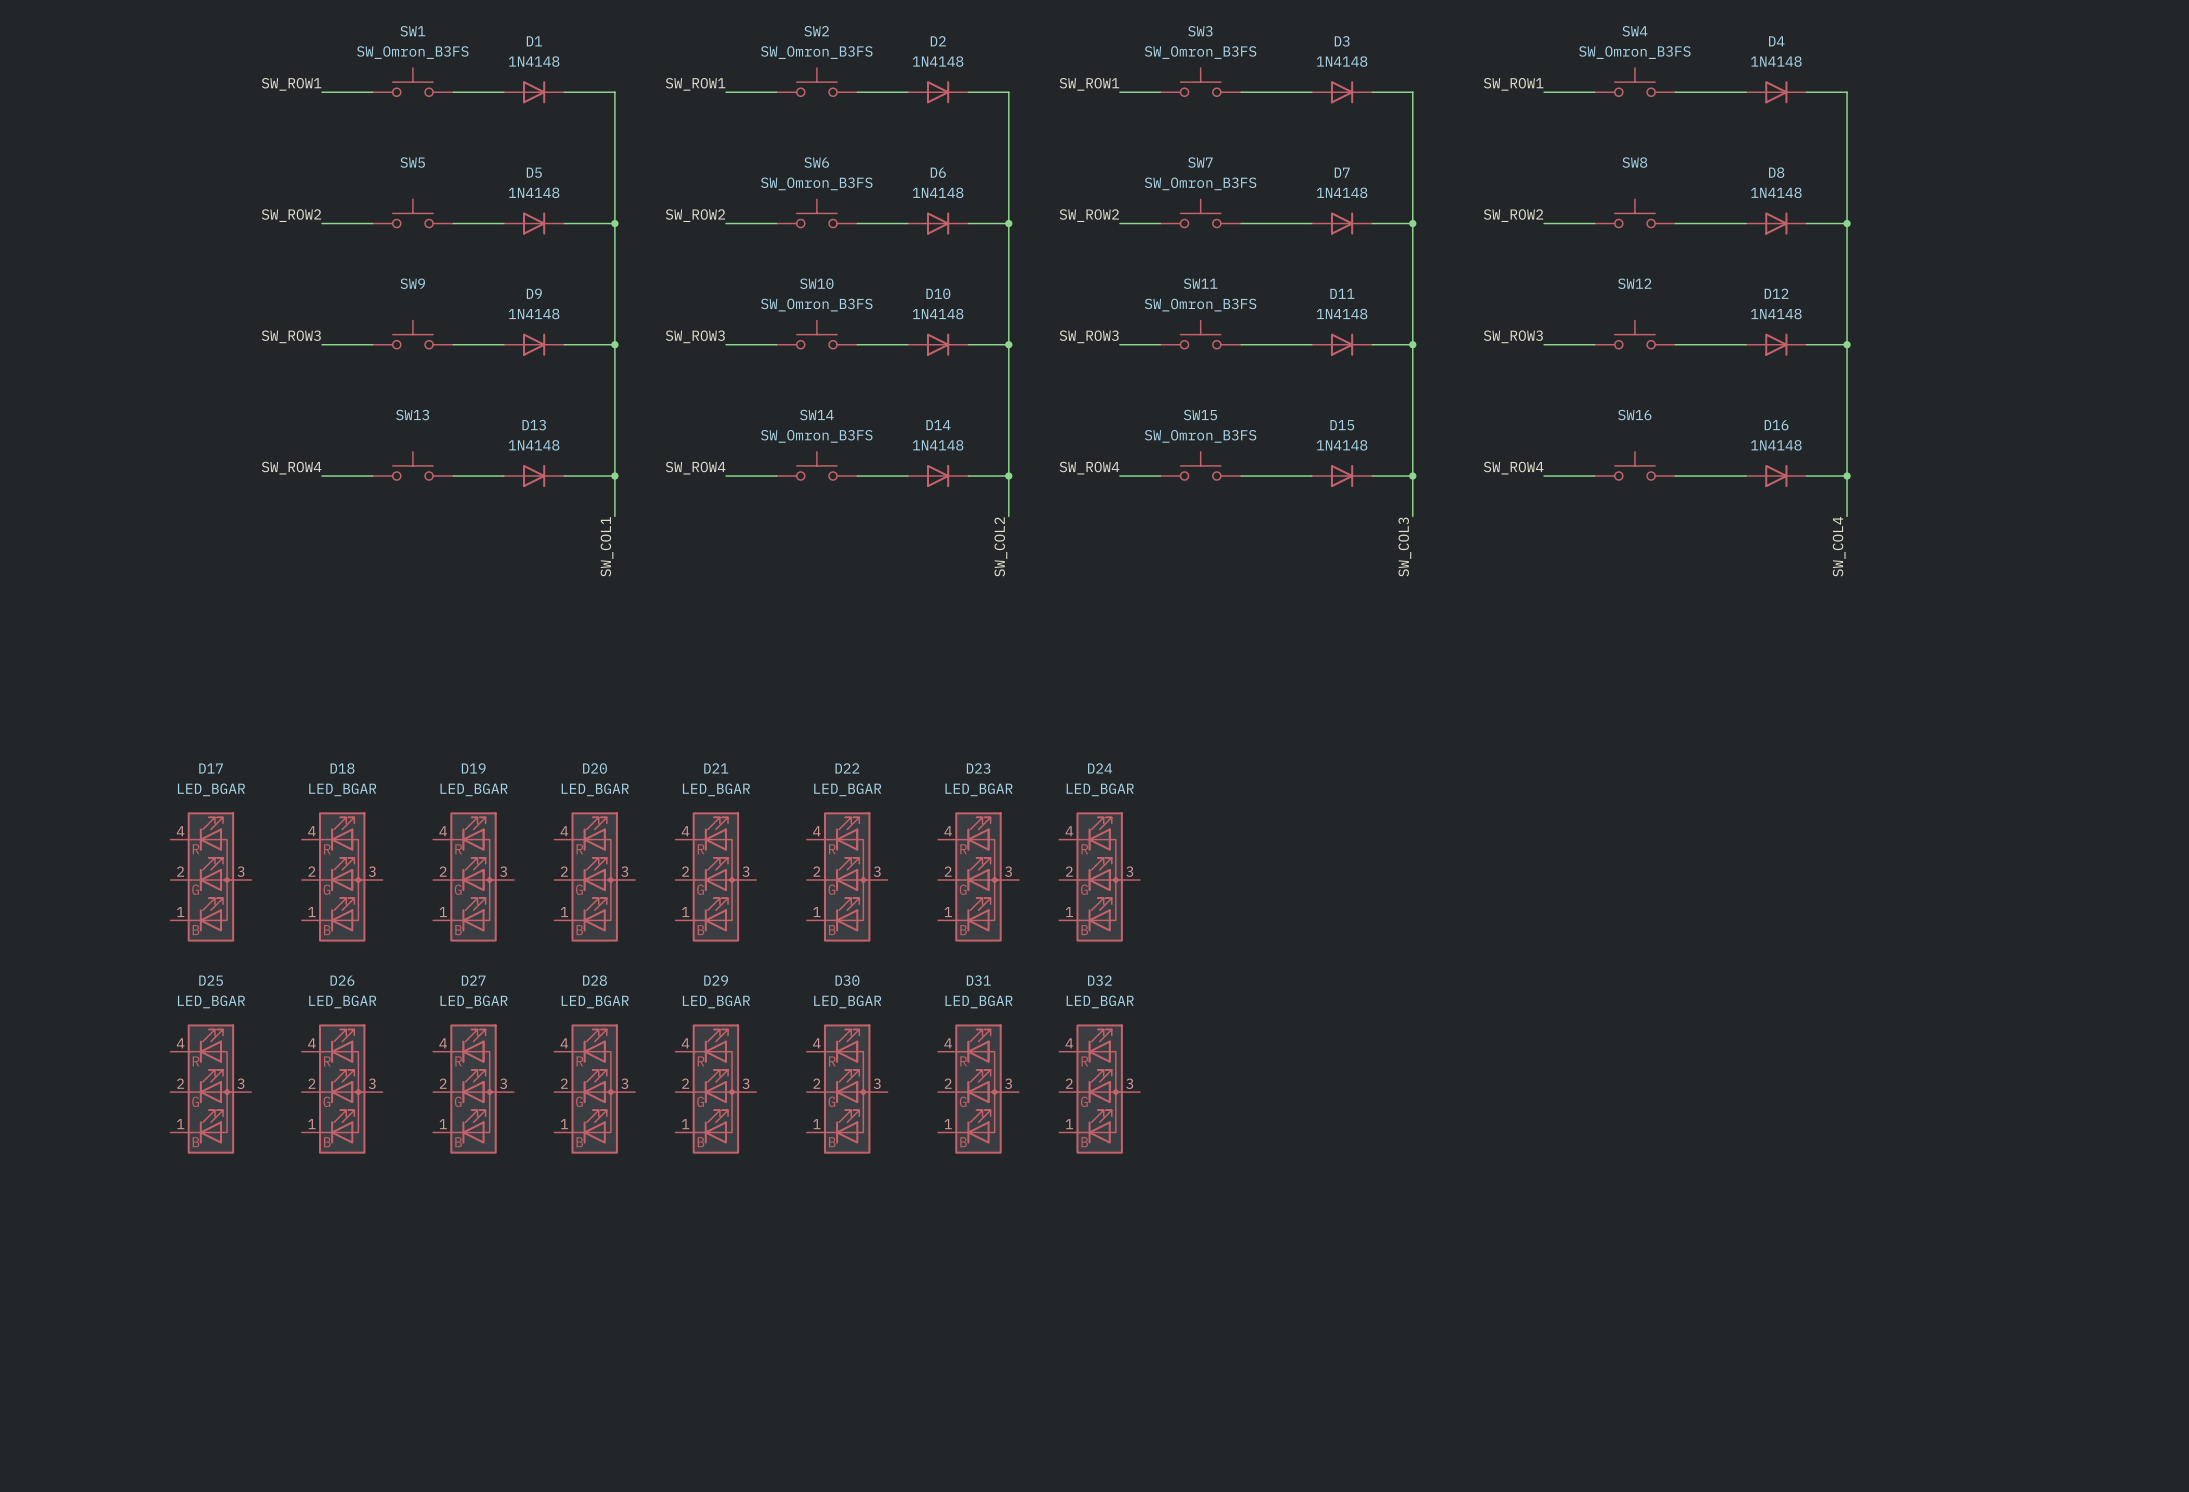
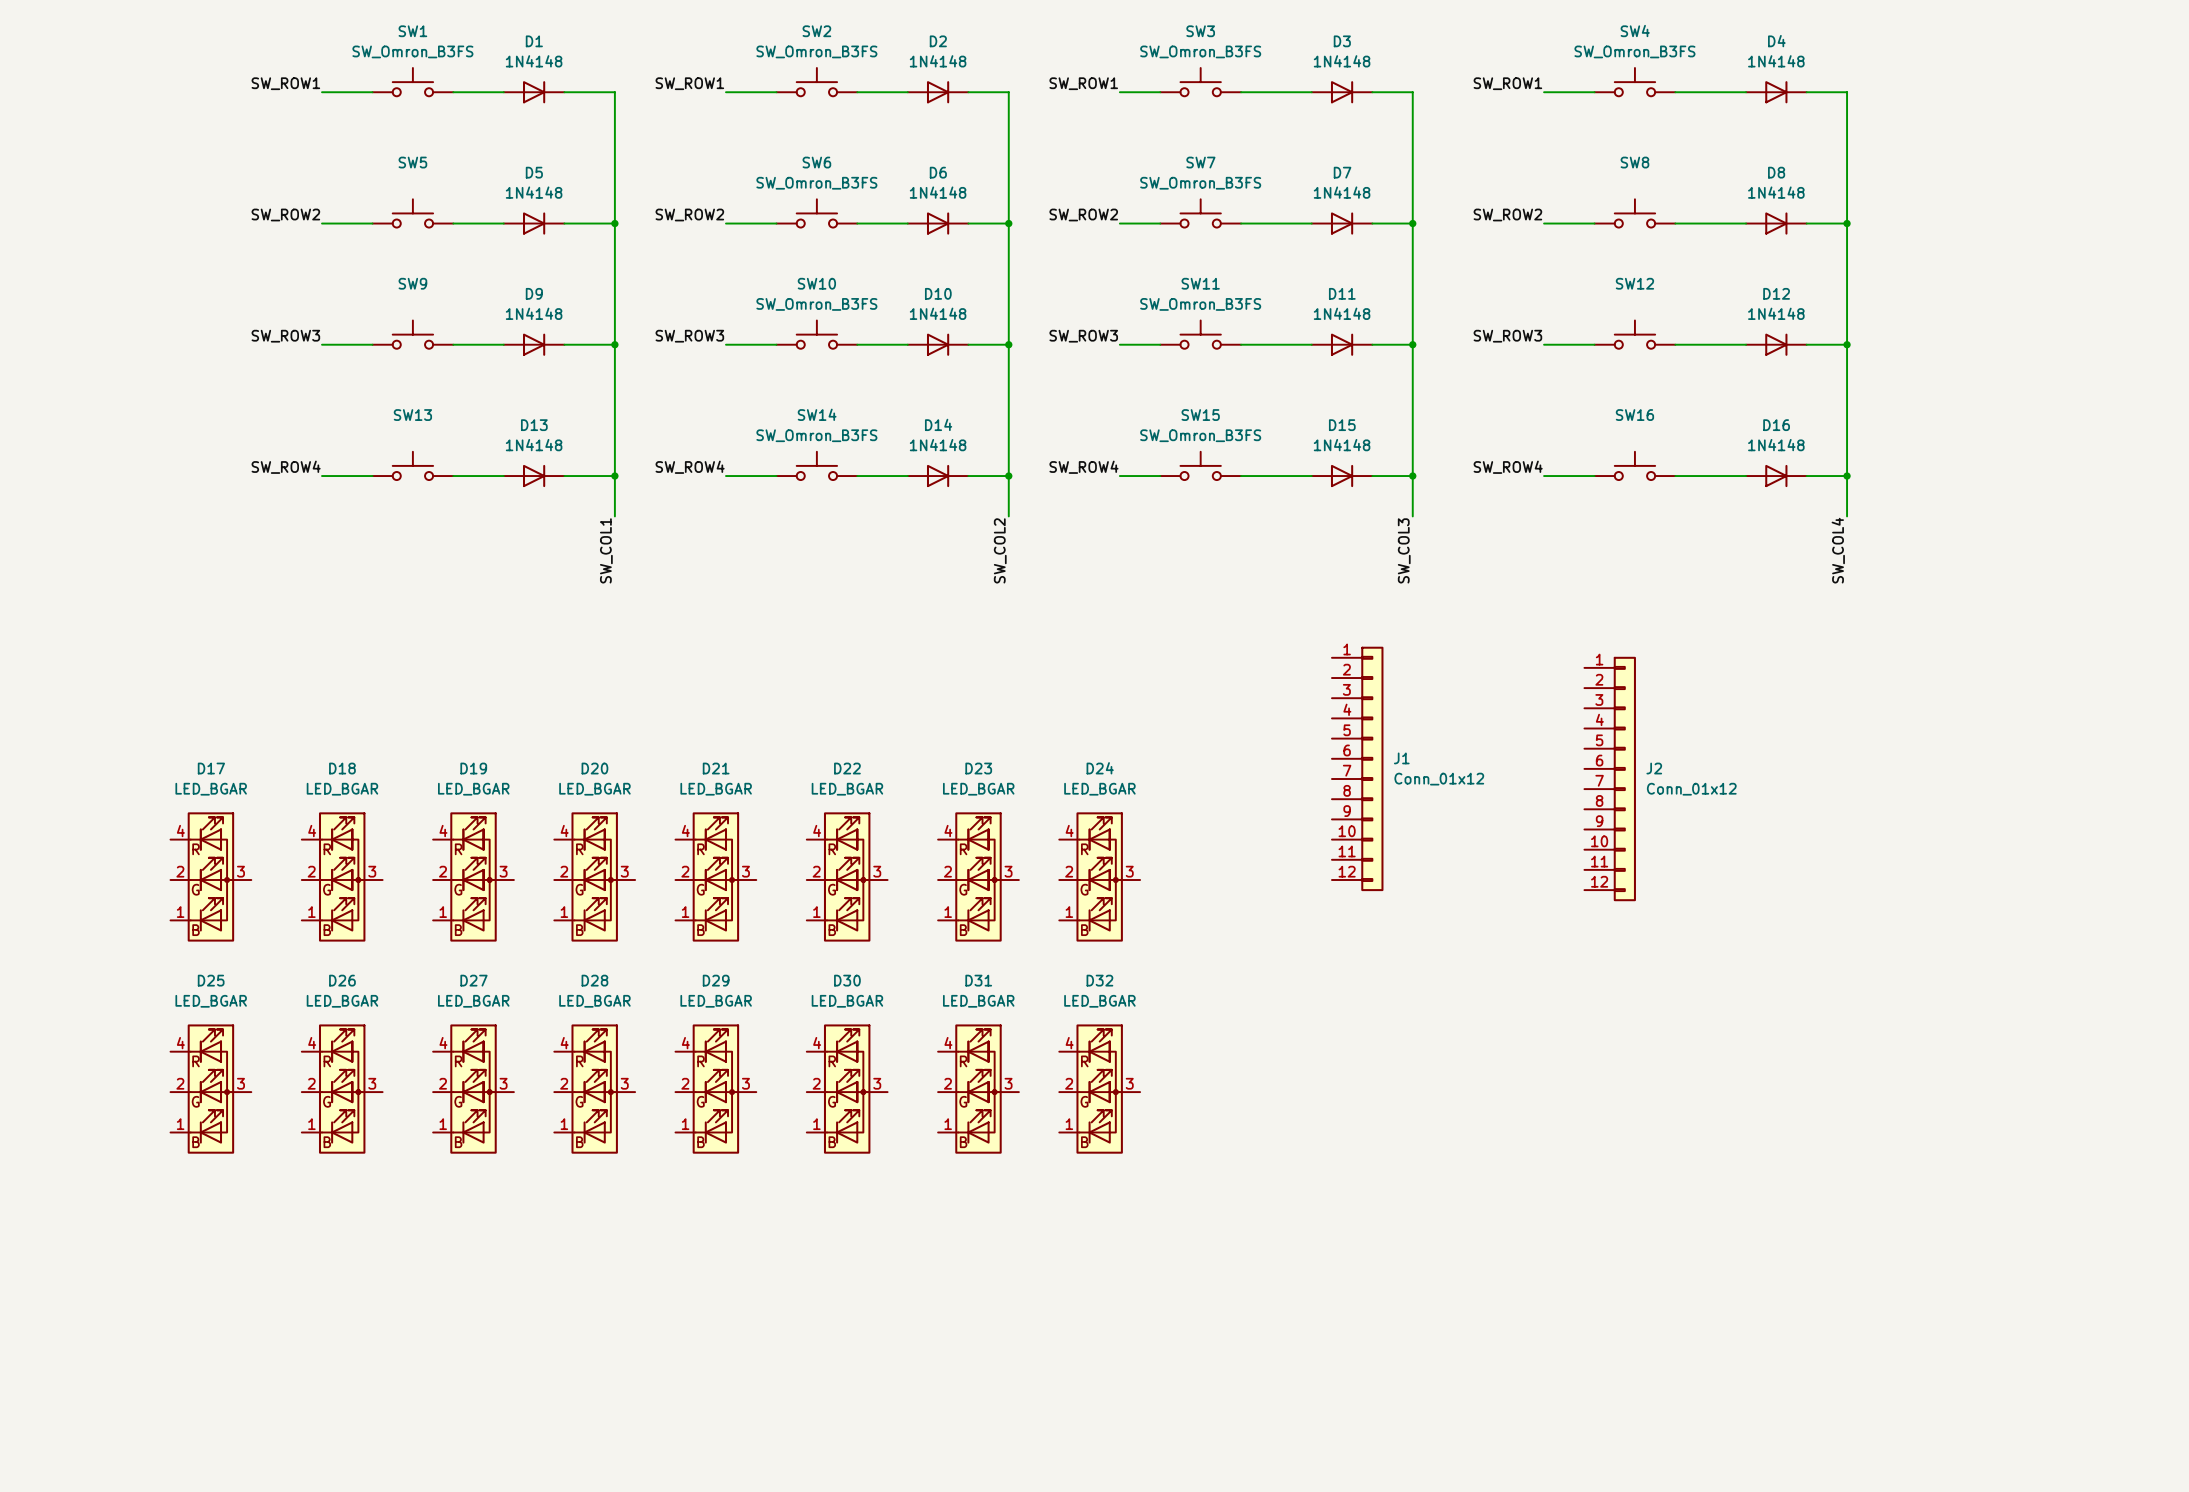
J1: none -> Conn_01x12 (1357, 768)
J2: none -> Conn_01x12 (1610, 779)

